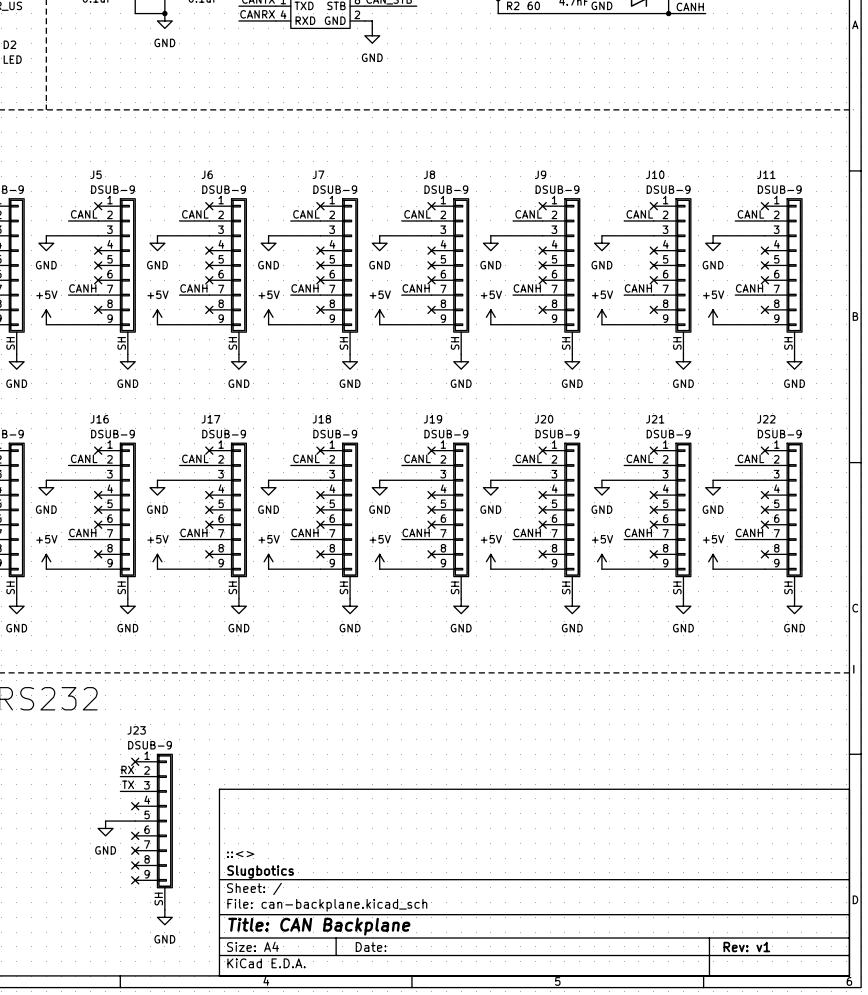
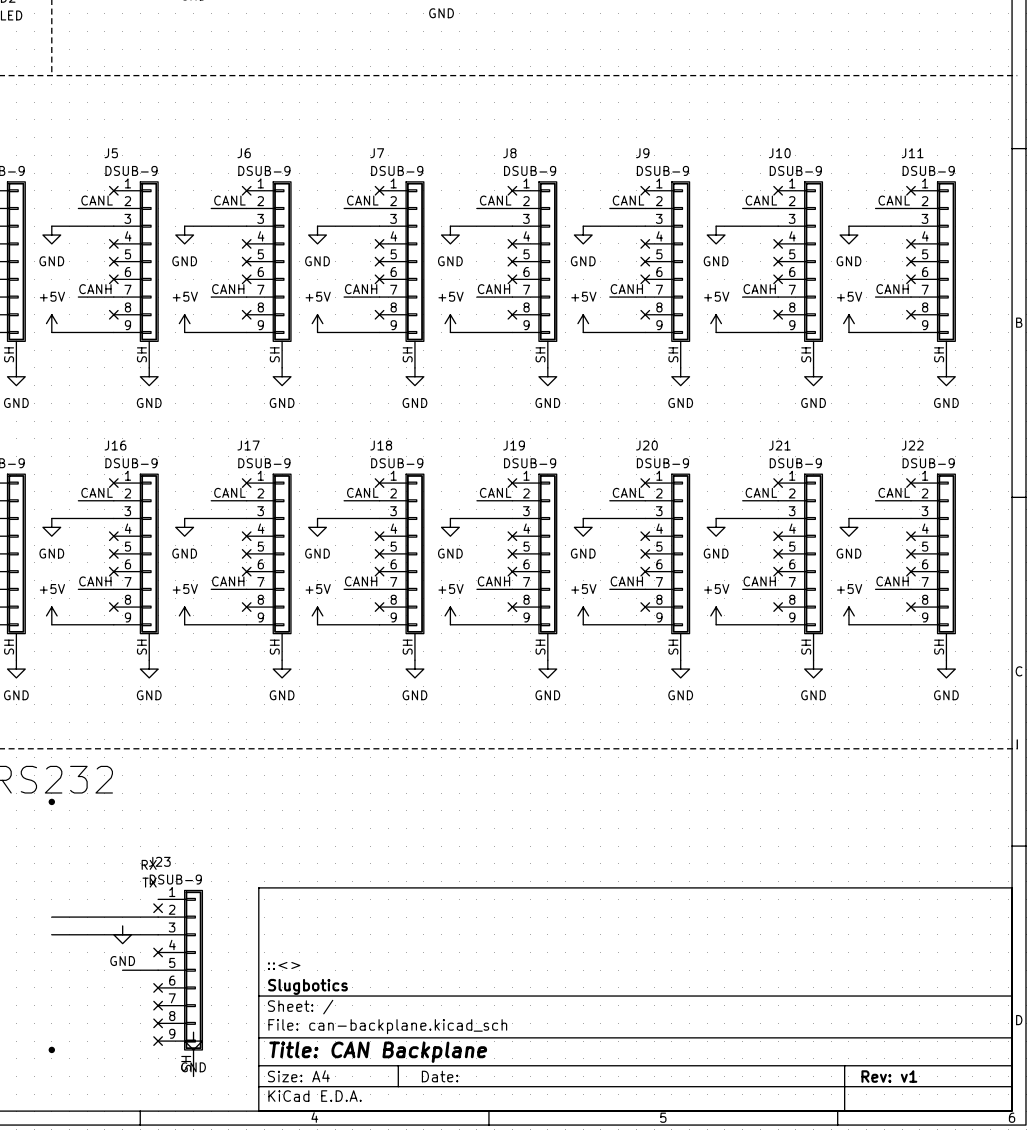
junction: none -> (51, 801)
no-connect mark: (135, 761) -> none
wire: (120, 776) (135, 776) -> none
wire: (120, 791) (135, 791) -> none
wire: none -> (51, 917) (158, 917)
wire: (105, 821) (135, 821) -> (122, 970) (158, 970)
wire: none -> (51, 934) (158, 934)
J23 position: (153, 831) -> (180, 983)
no-connect mark: (135, 835) -> none
no-connect mark: none -> (158, 952)
no-connect mark: (135, 850) -> none
no-connect mark: (135, 865) -> none
no-connect mark: none -> (158, 987)
no-connect mark: (135, 880) -> none
no-connect mark: none -> (158, 1005)
no-connect mark: none -> (158, 1023)
no-connect mark: none -> (158, 1041)
junction: none -> (51, 1049)

